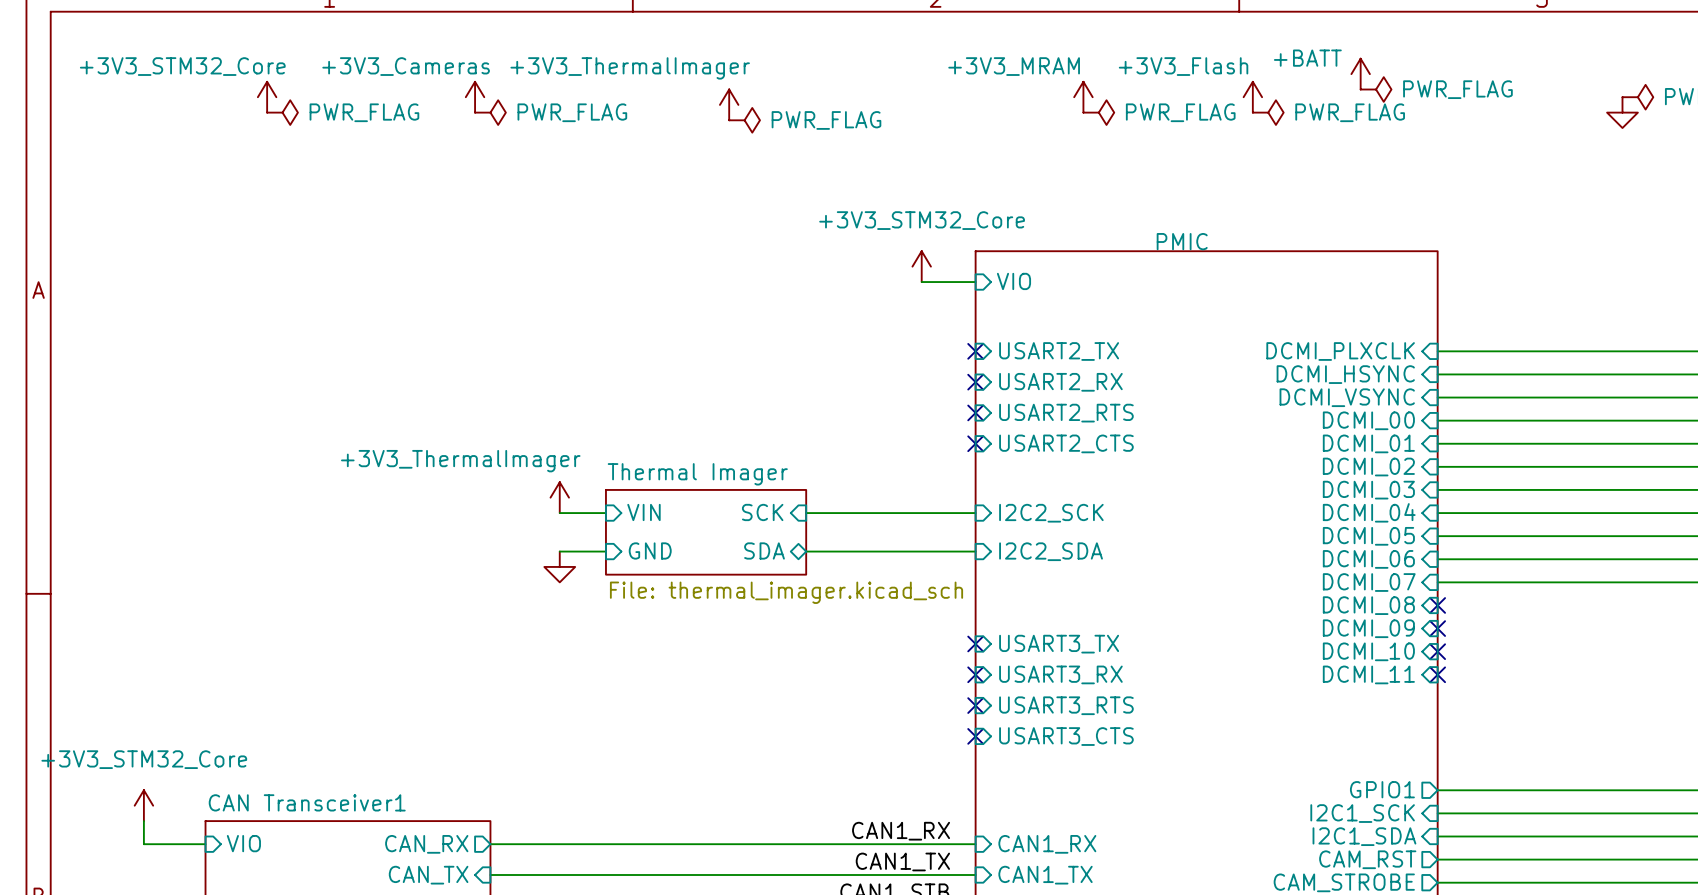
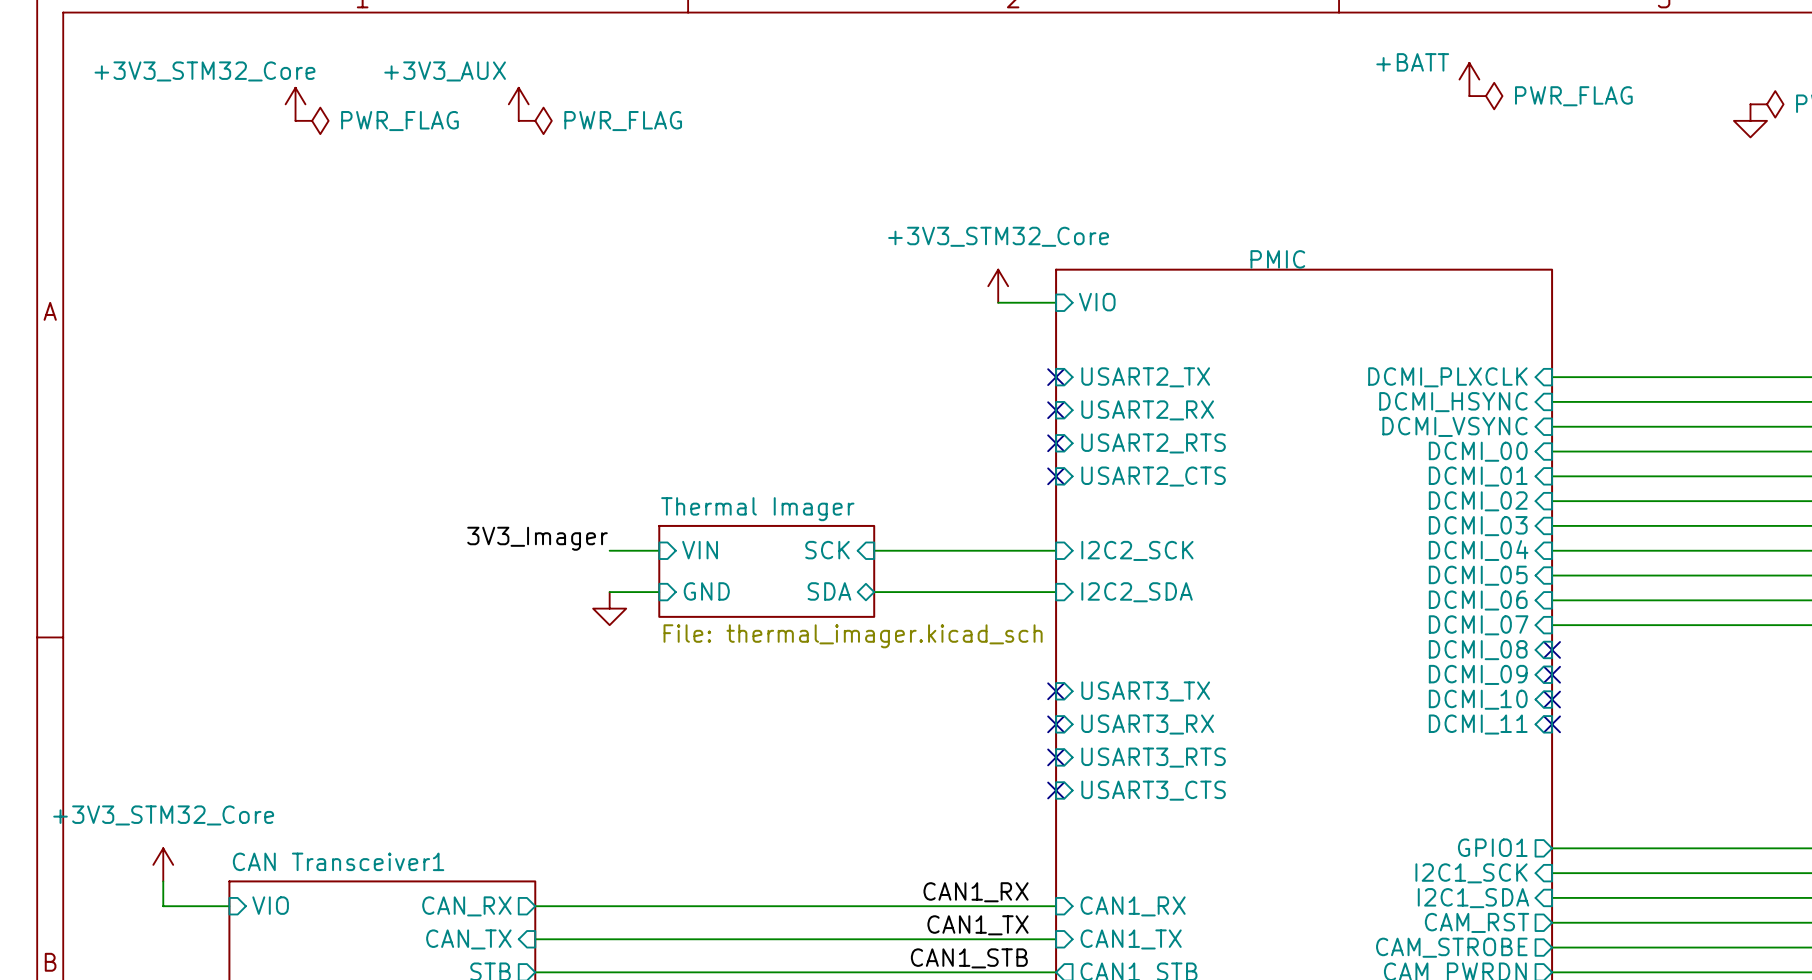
power symbol: +3V3_Cameras (475, 97) -> +3V3_AUX (518, 104)
power symbol: +3V3_MRAM (1083, 97) -> none
power symbol: +3V3_Flash (1252, 97) -> none
power symbol: +3V3_ThermalImager (729, 104) -> none
power symbol: PWR_FLAG (1098, 112) -> none
power symbol: PWR_FLAG (1268, 112) -> none
power symbol: PWR_FLAG (744, 120) -> none
power symbol: +3V3_ThermalImager (559, 497) -> none
label: none -> 3V3_Imager (537, 538)

